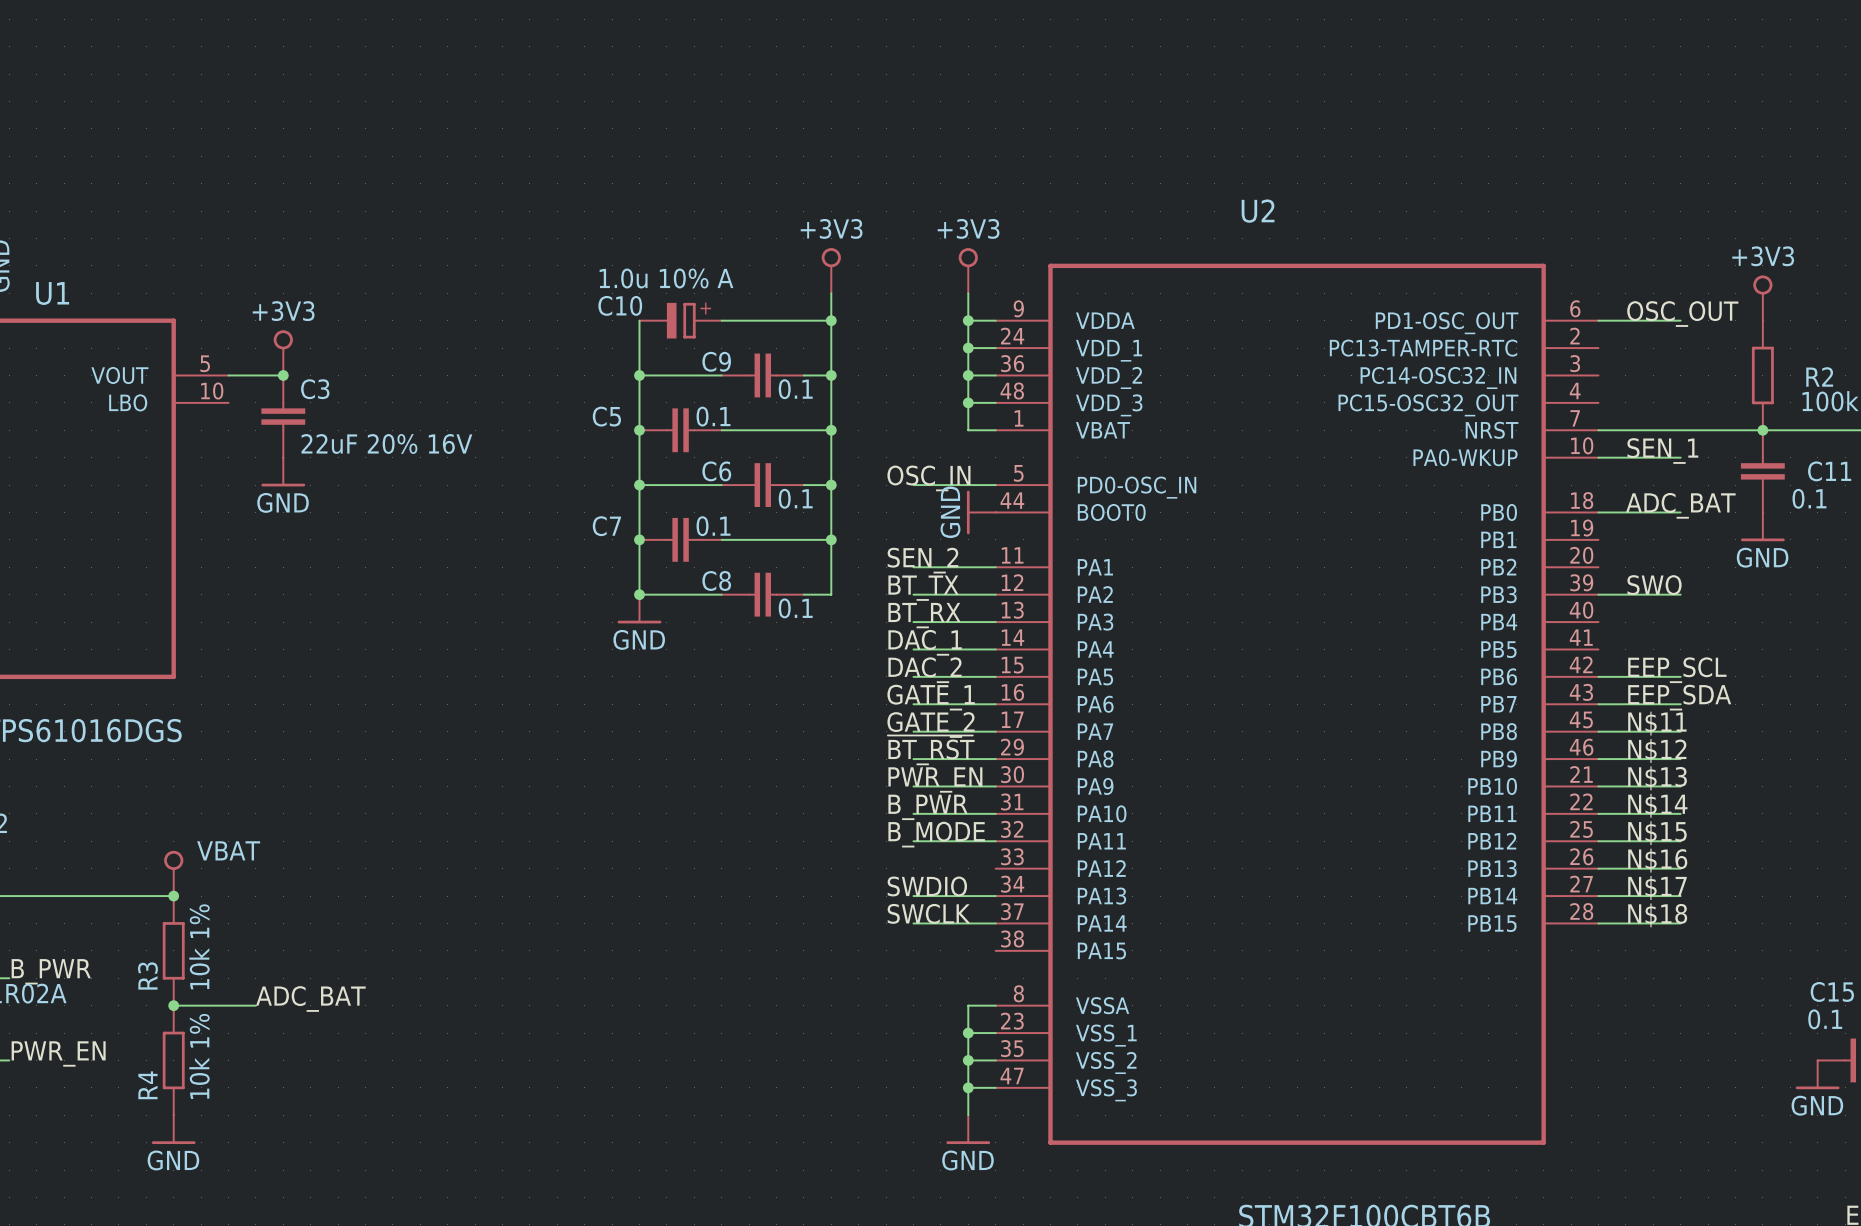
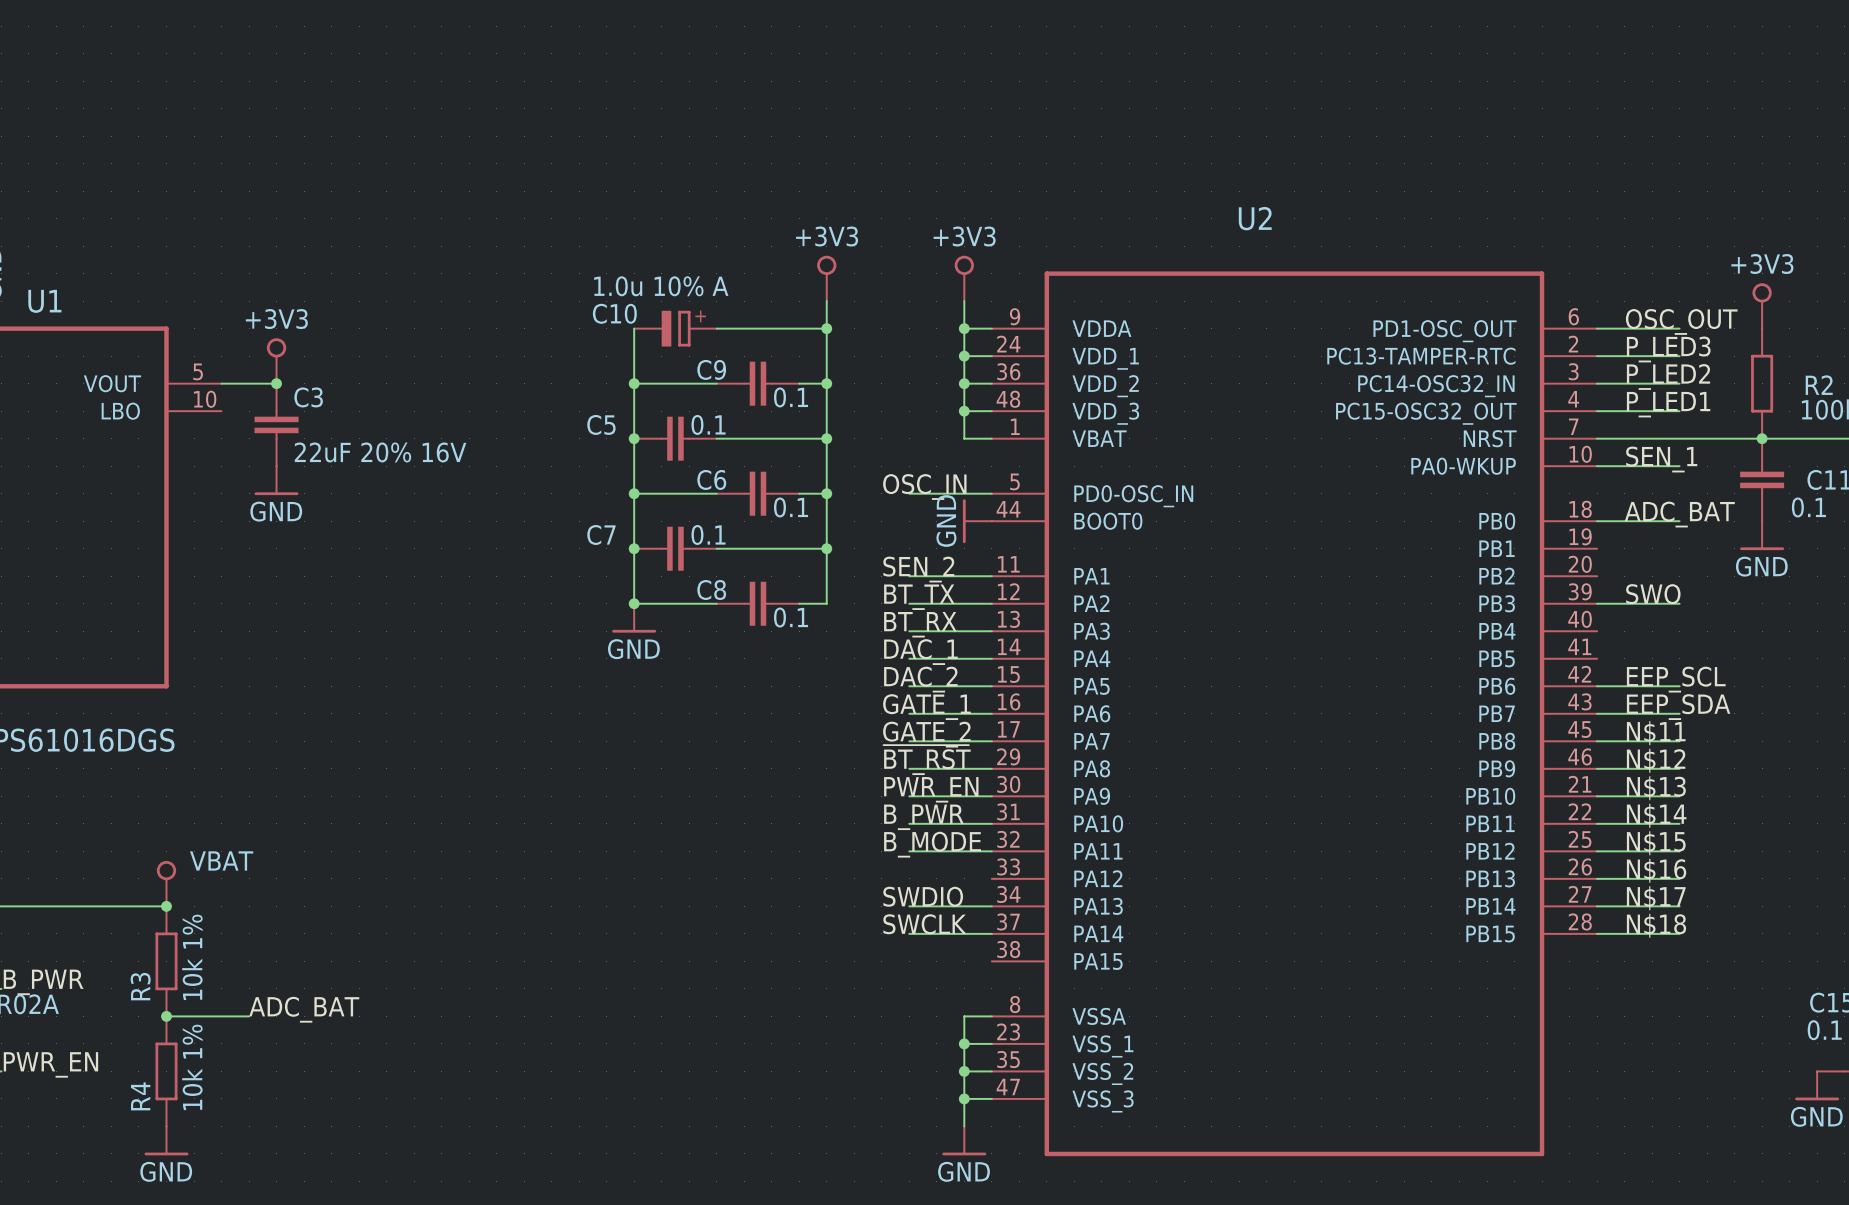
label: none -> P_LED3 (1668, 349)
wire: none -> (1597, 356) (1679, 356)
label: none -> P_LED2 (1668, 376)
wire: none -> (1597, 383) (1679, 383)
label: none -> P_LED1 (1668, 404)
wire: none -> (1597, 411) (1679, 411)

